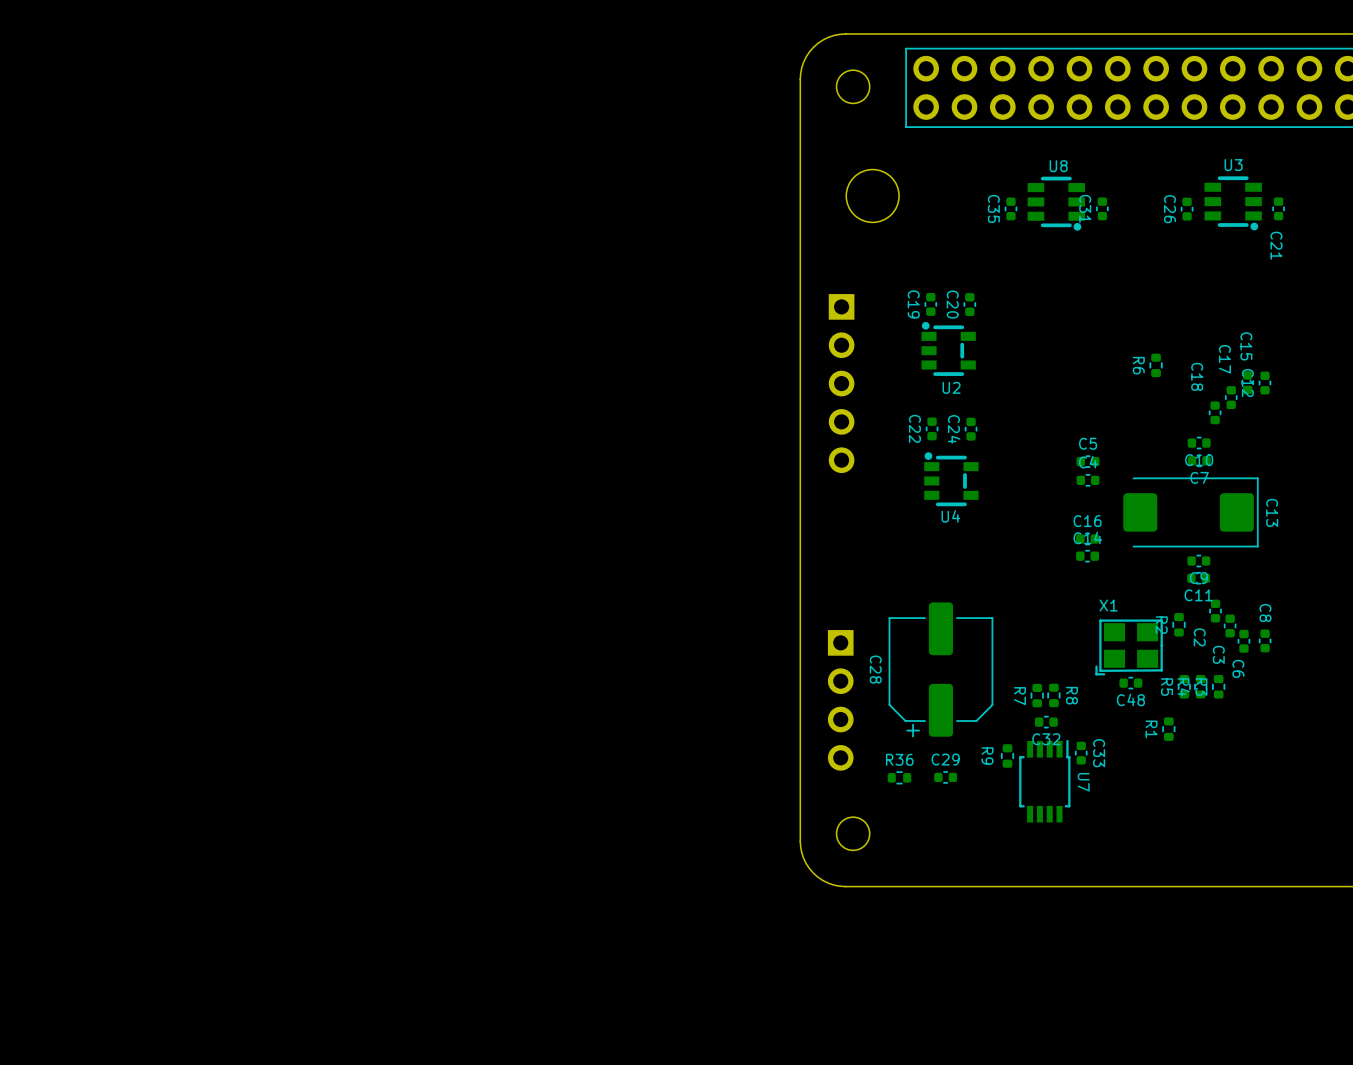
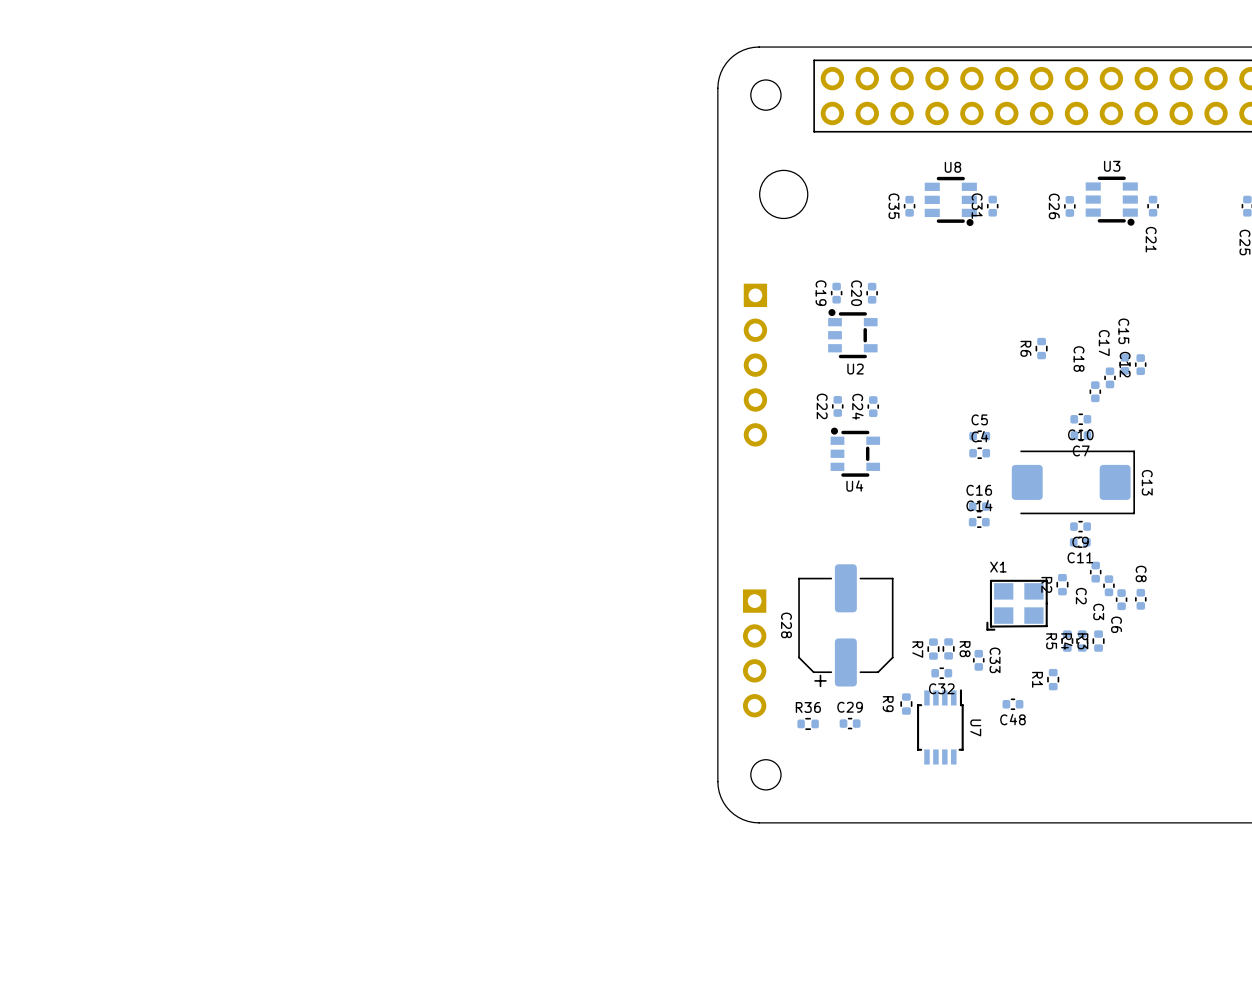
C48 position: (1130, 683) -> (1012, 704)
C33 position: (1081, 753) -> (978, 660)

